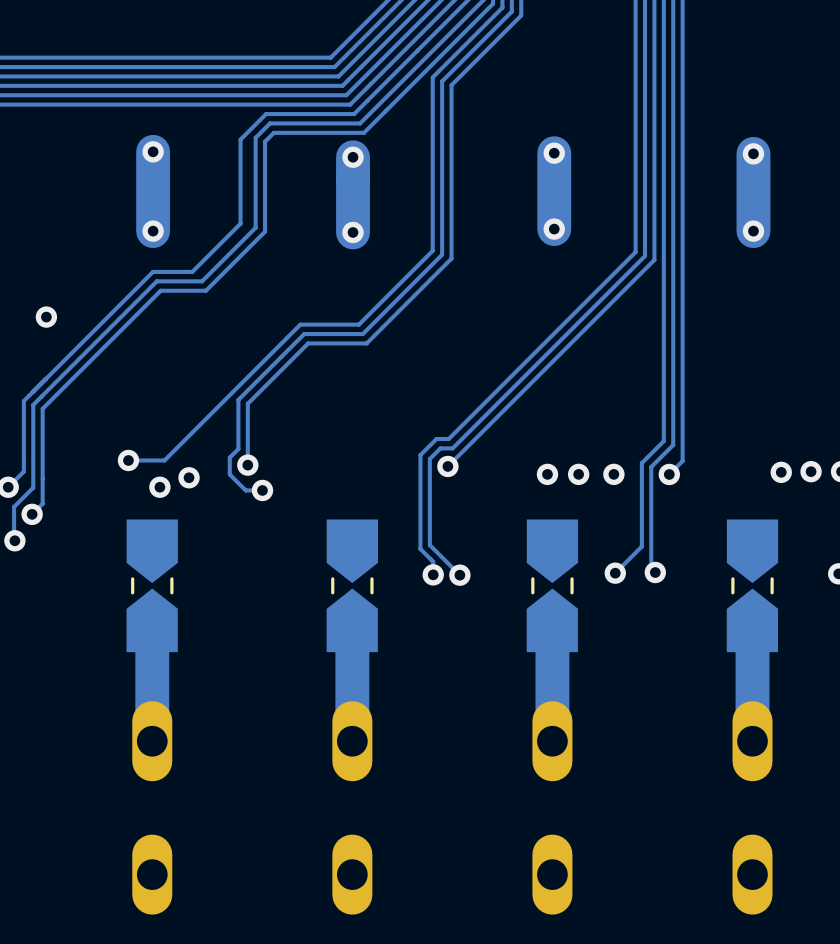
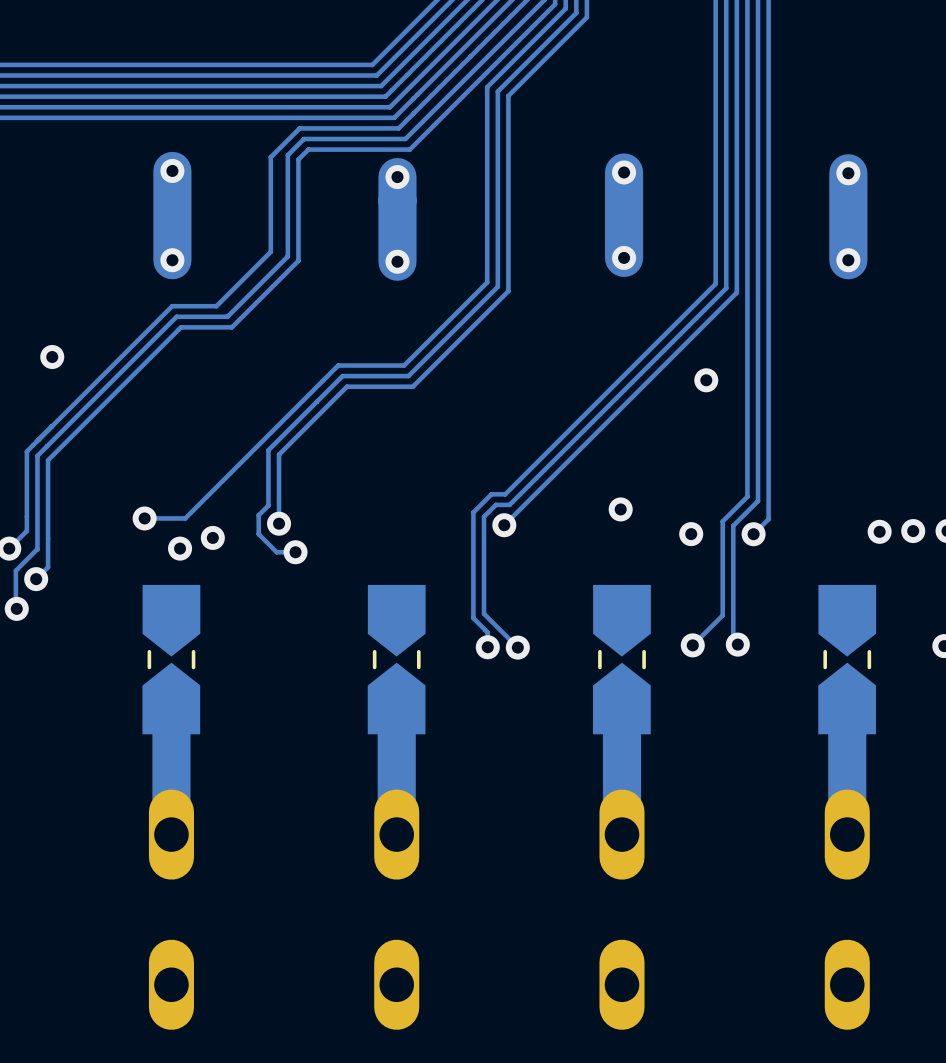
via: none -> (706, 380)
via: none -> (620, 509)
via: (547, 474) -> none
via: (578, 474) -> none

